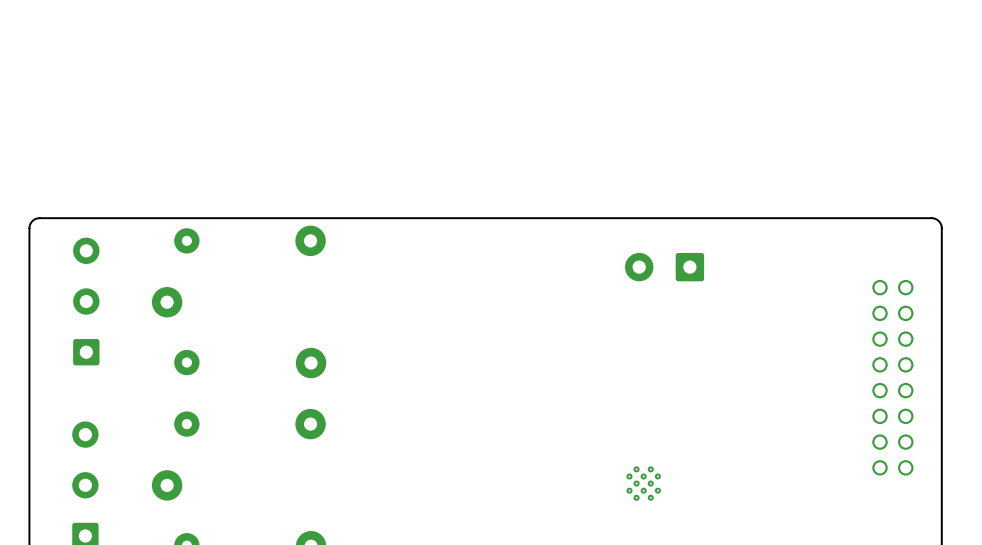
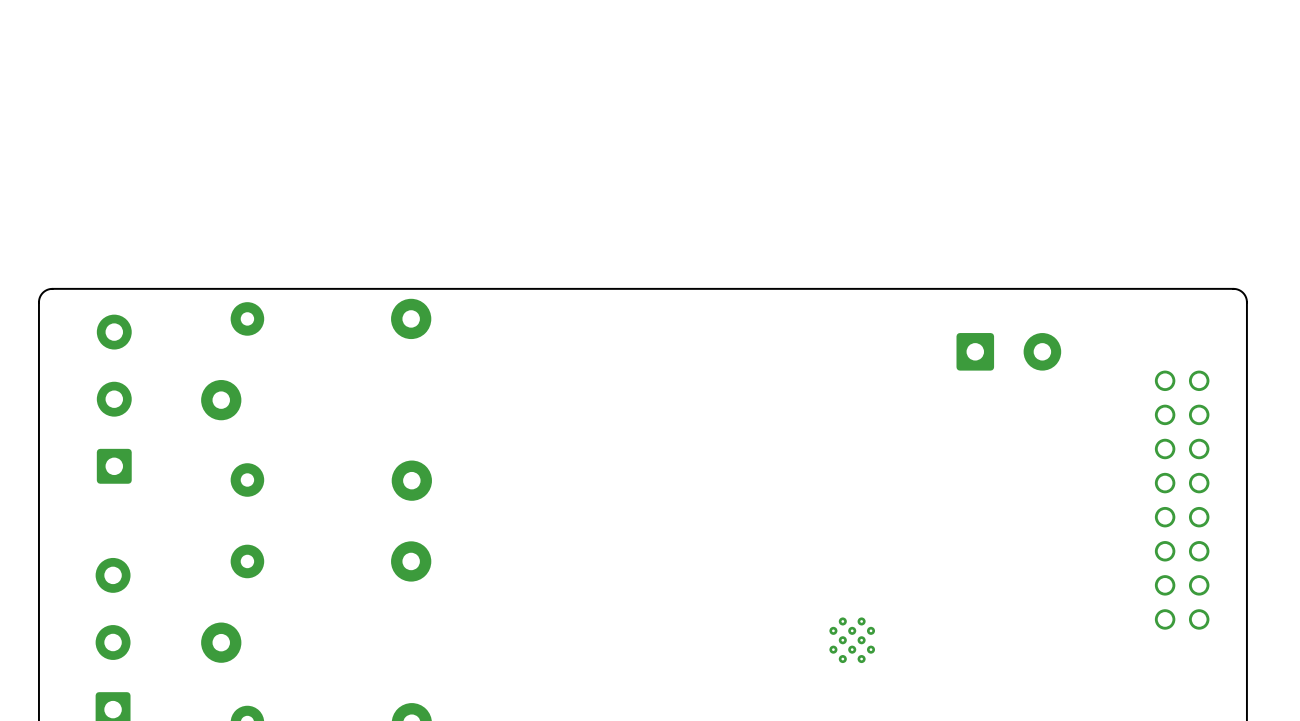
part rotation: 0° (664, 267) -> 180° (1008, 351)
part position: (664, 267) -> (1008, 351)

